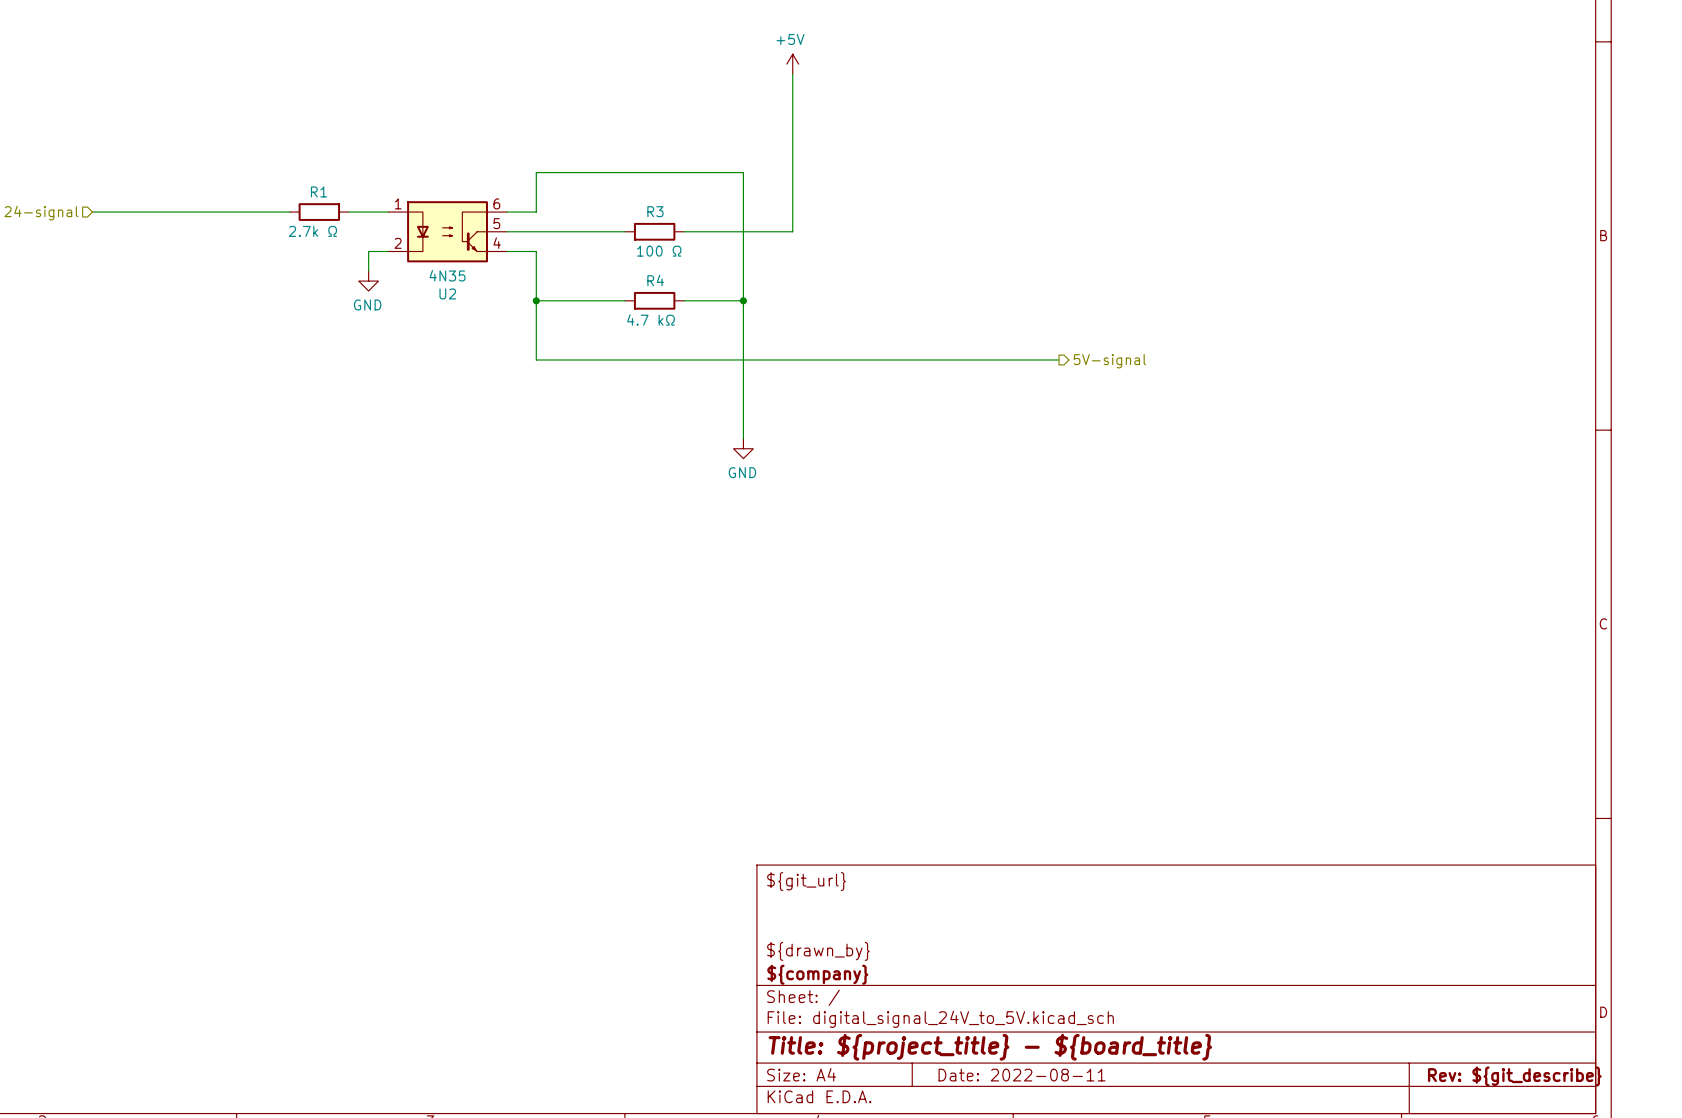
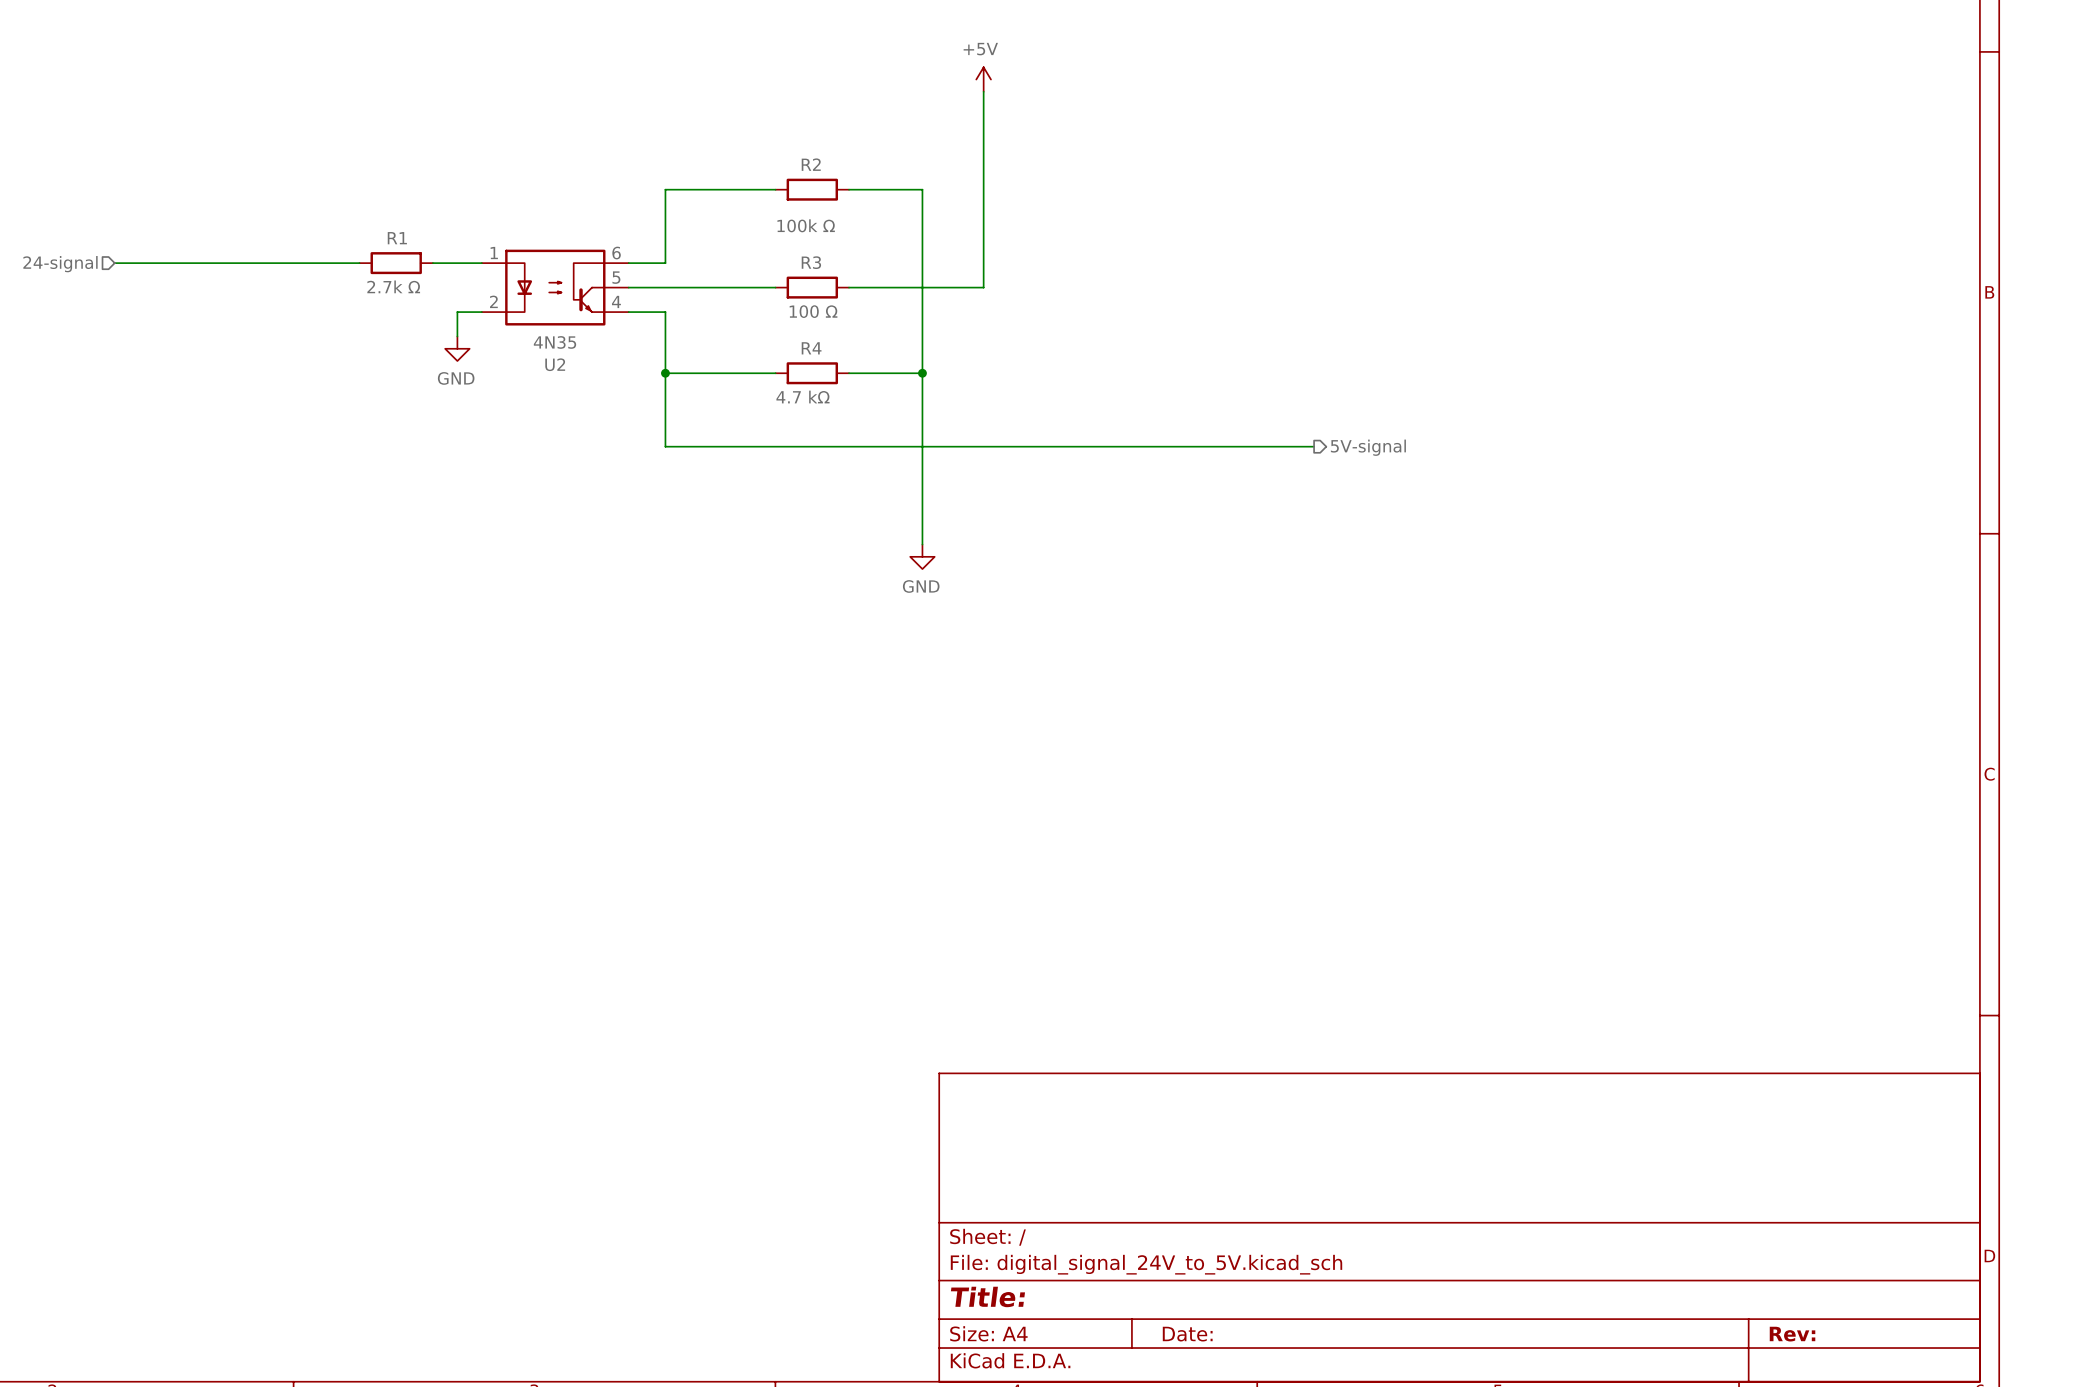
R2: none -> 100k Ω (812, 189)
wire: none -> (849, 189) (922, 189) (922, 214)
wire: (536, 172) (743, 172) -> (665, 214) (665, 189) (775, 189)
title block: ${git_url} (806, 881) -> none
title block: ${drawn_by} (818, 951) -> none
title block: ${company} (817, 974) -> none
title block: Title: ${project_title} - ${board_title} (990, 1047) -> Title: (987, 1296)
title block: Date: 2022-08-11 (1022, 1075) -> Date: (1187, 1334)
title block: Rev: ${git_describe} (1514, 1076) -> Rev: (1792, 1334)

